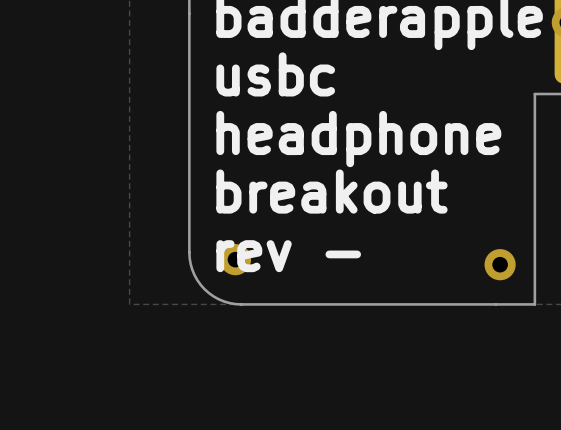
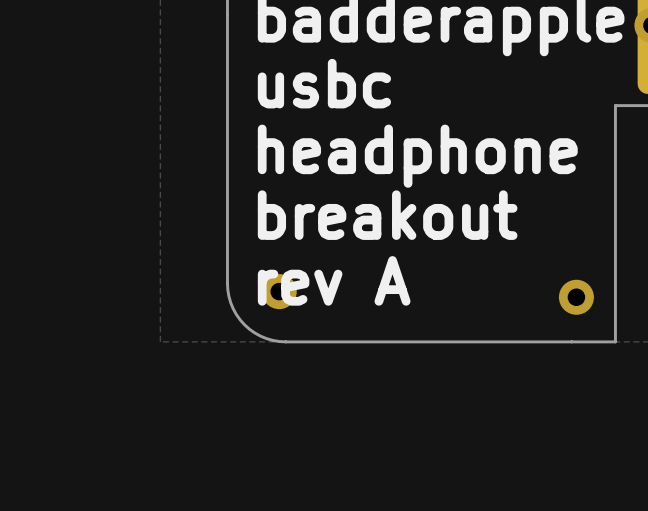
text: rev - (288, 256) -> rev A (334, 280)

